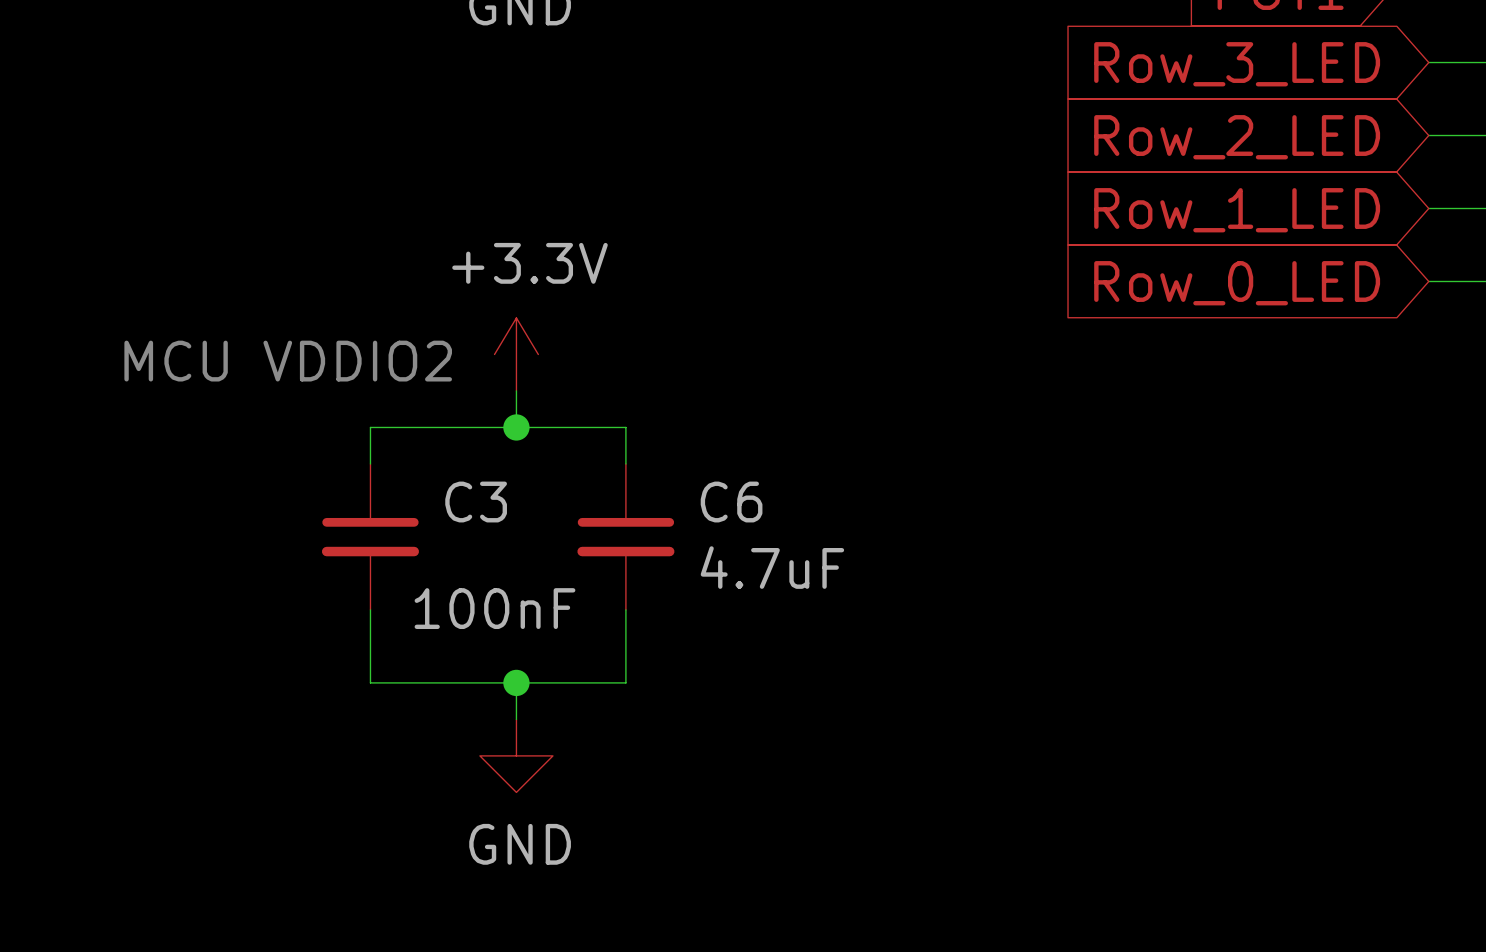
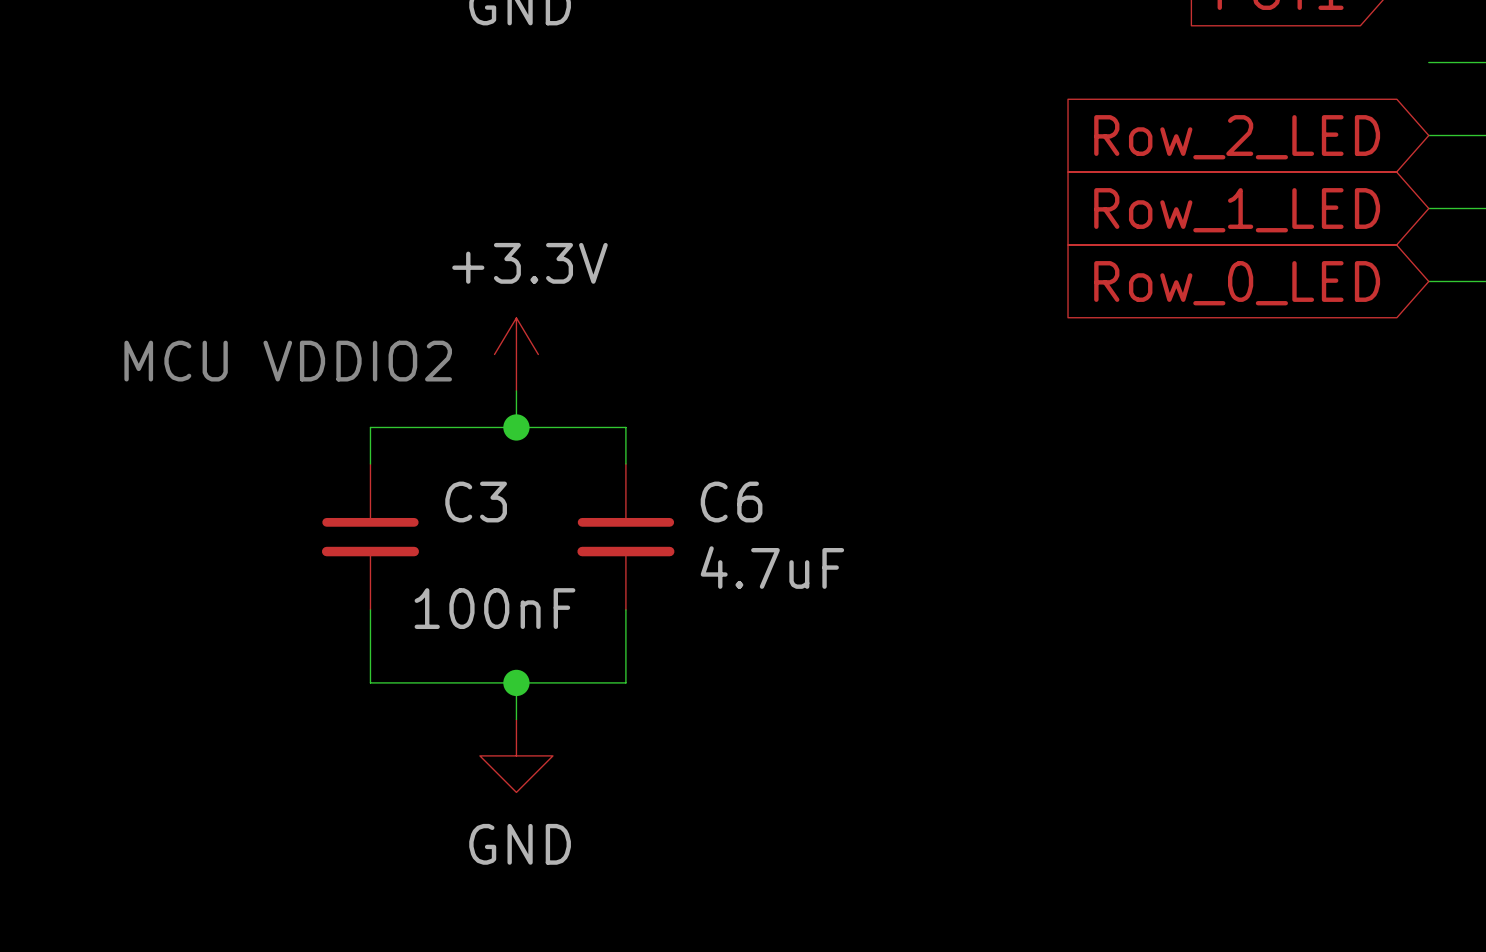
global label: Row_3_LED (1237, 64) -> none

